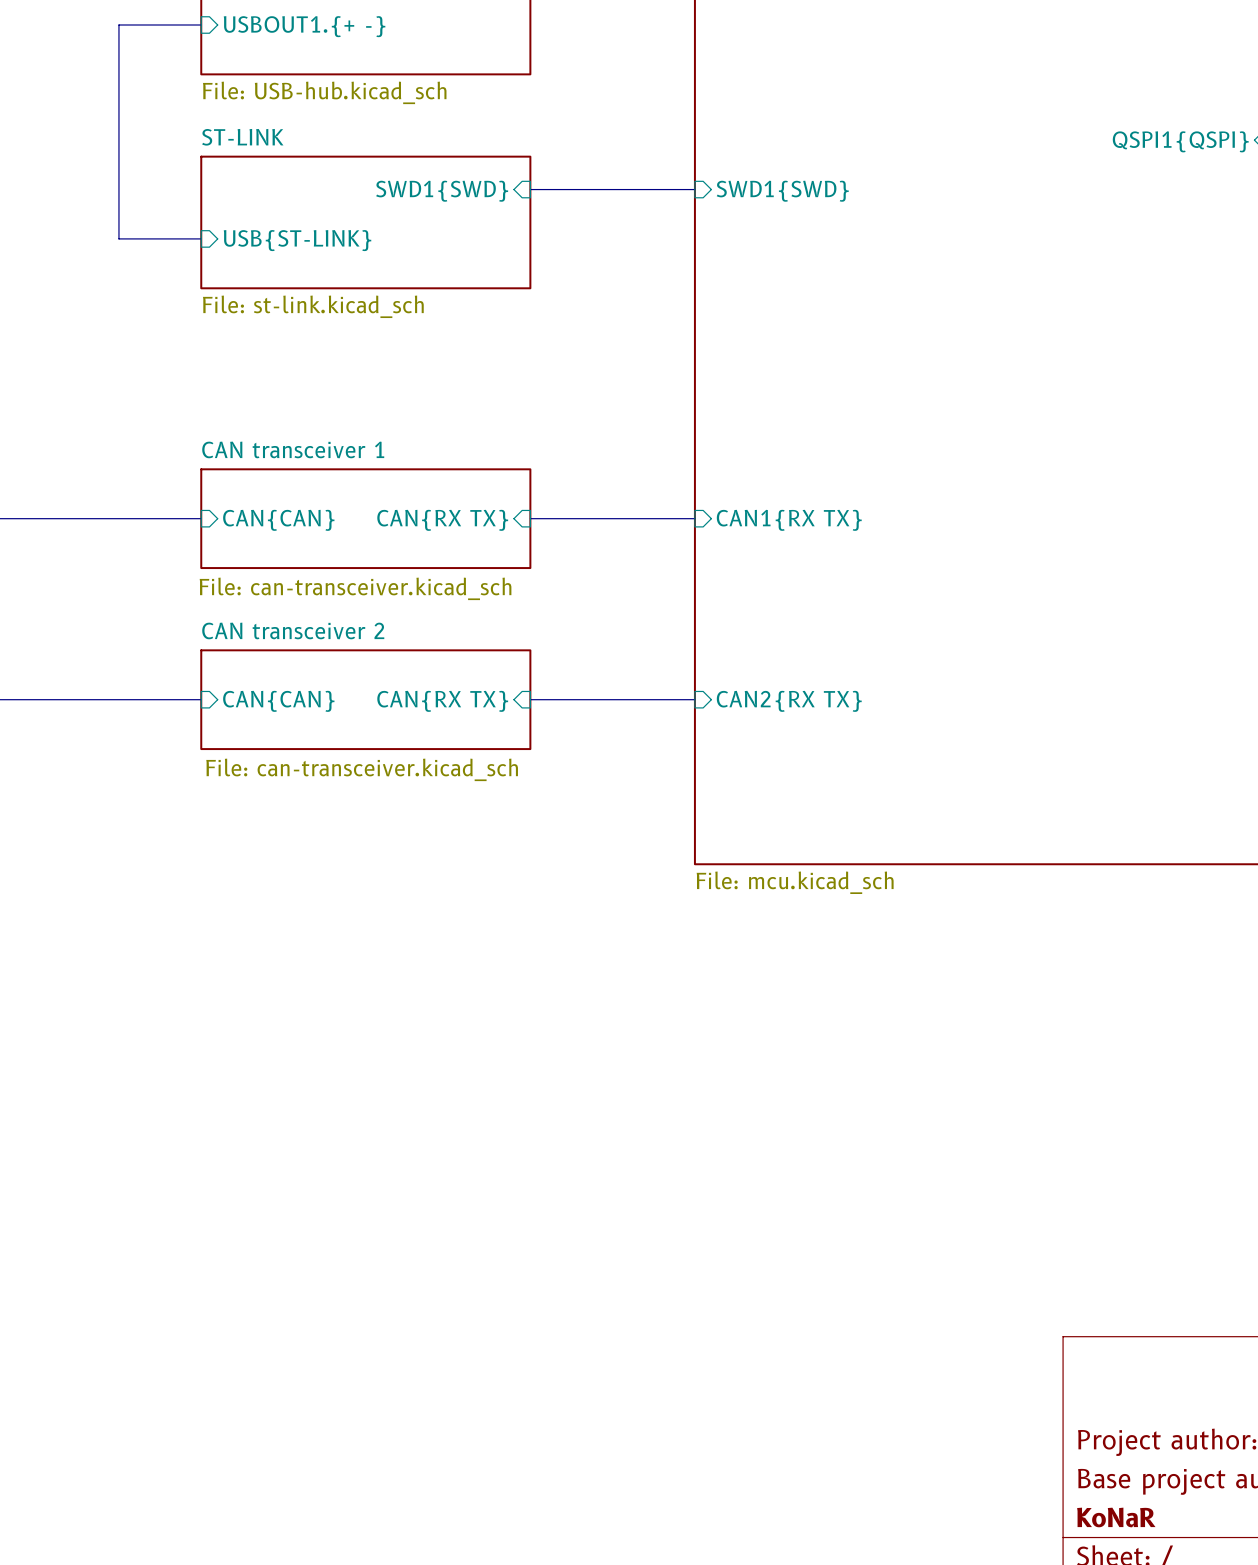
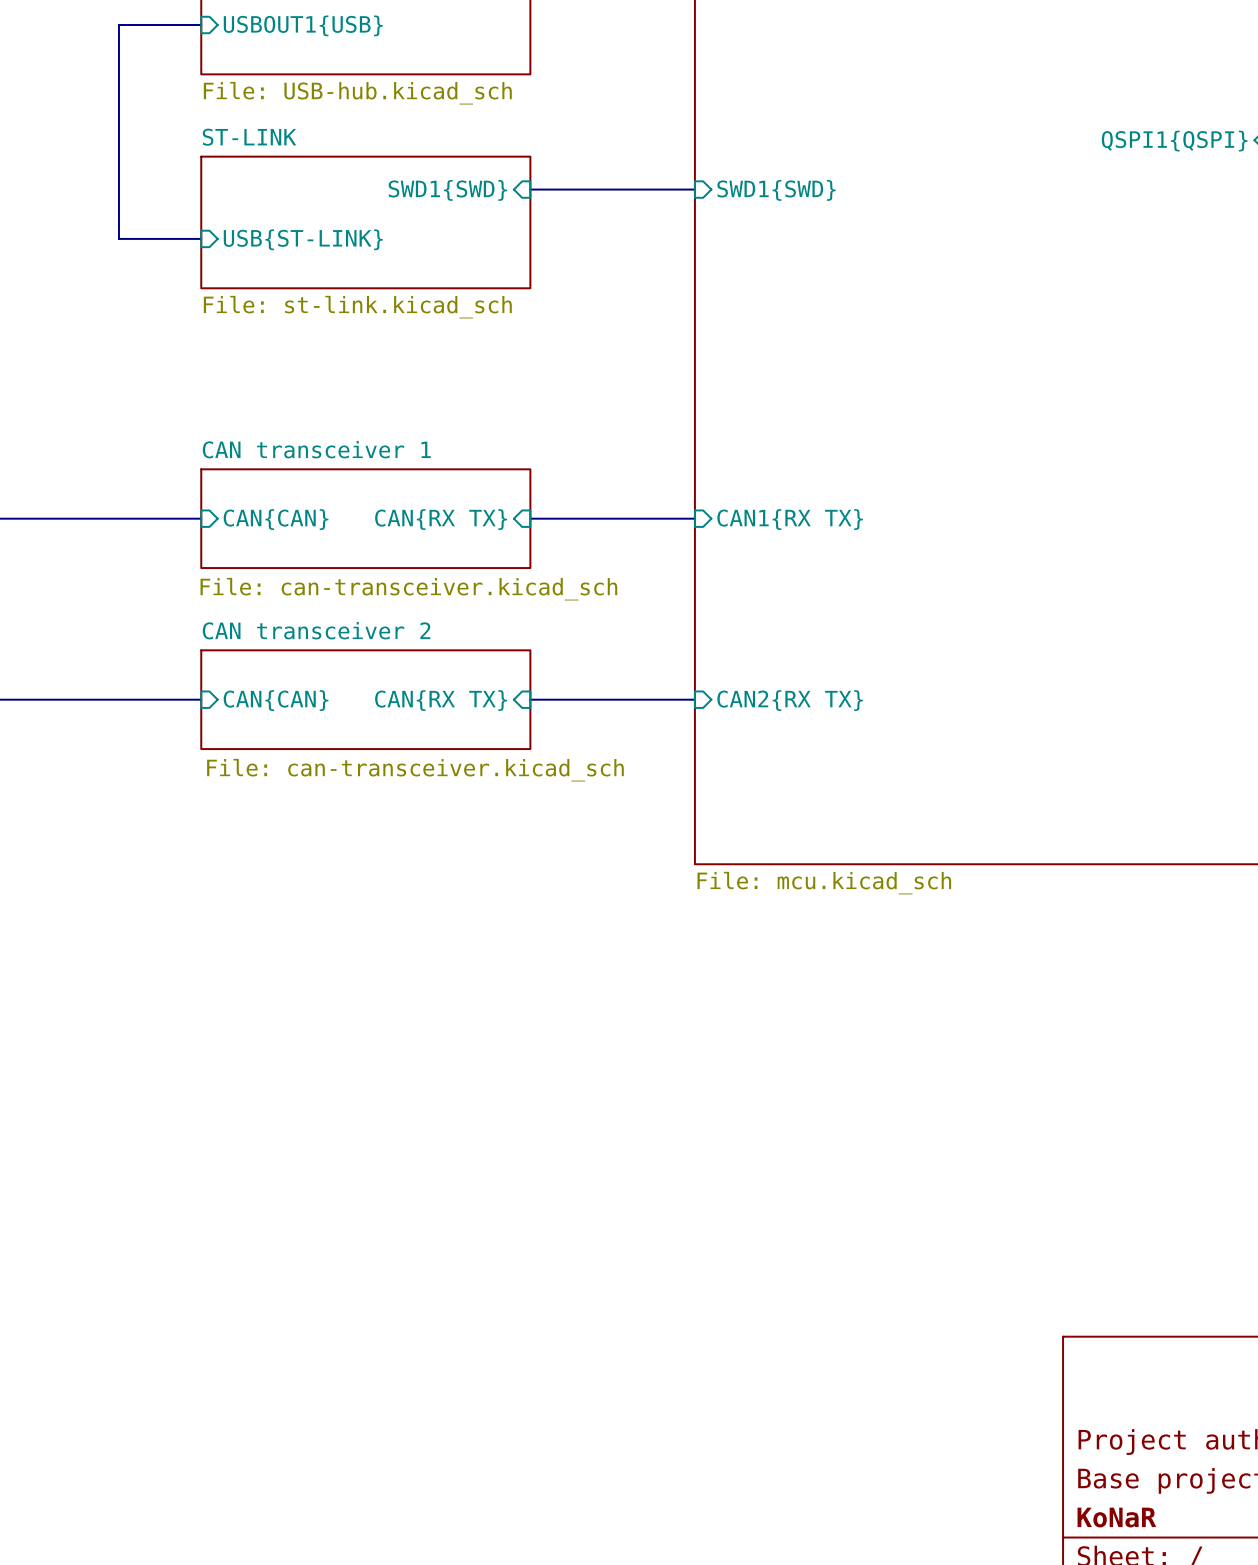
sheet pin: USBOUT1.{+ -} (304, 26) -> USBOUT1{USB} (303, 25)

